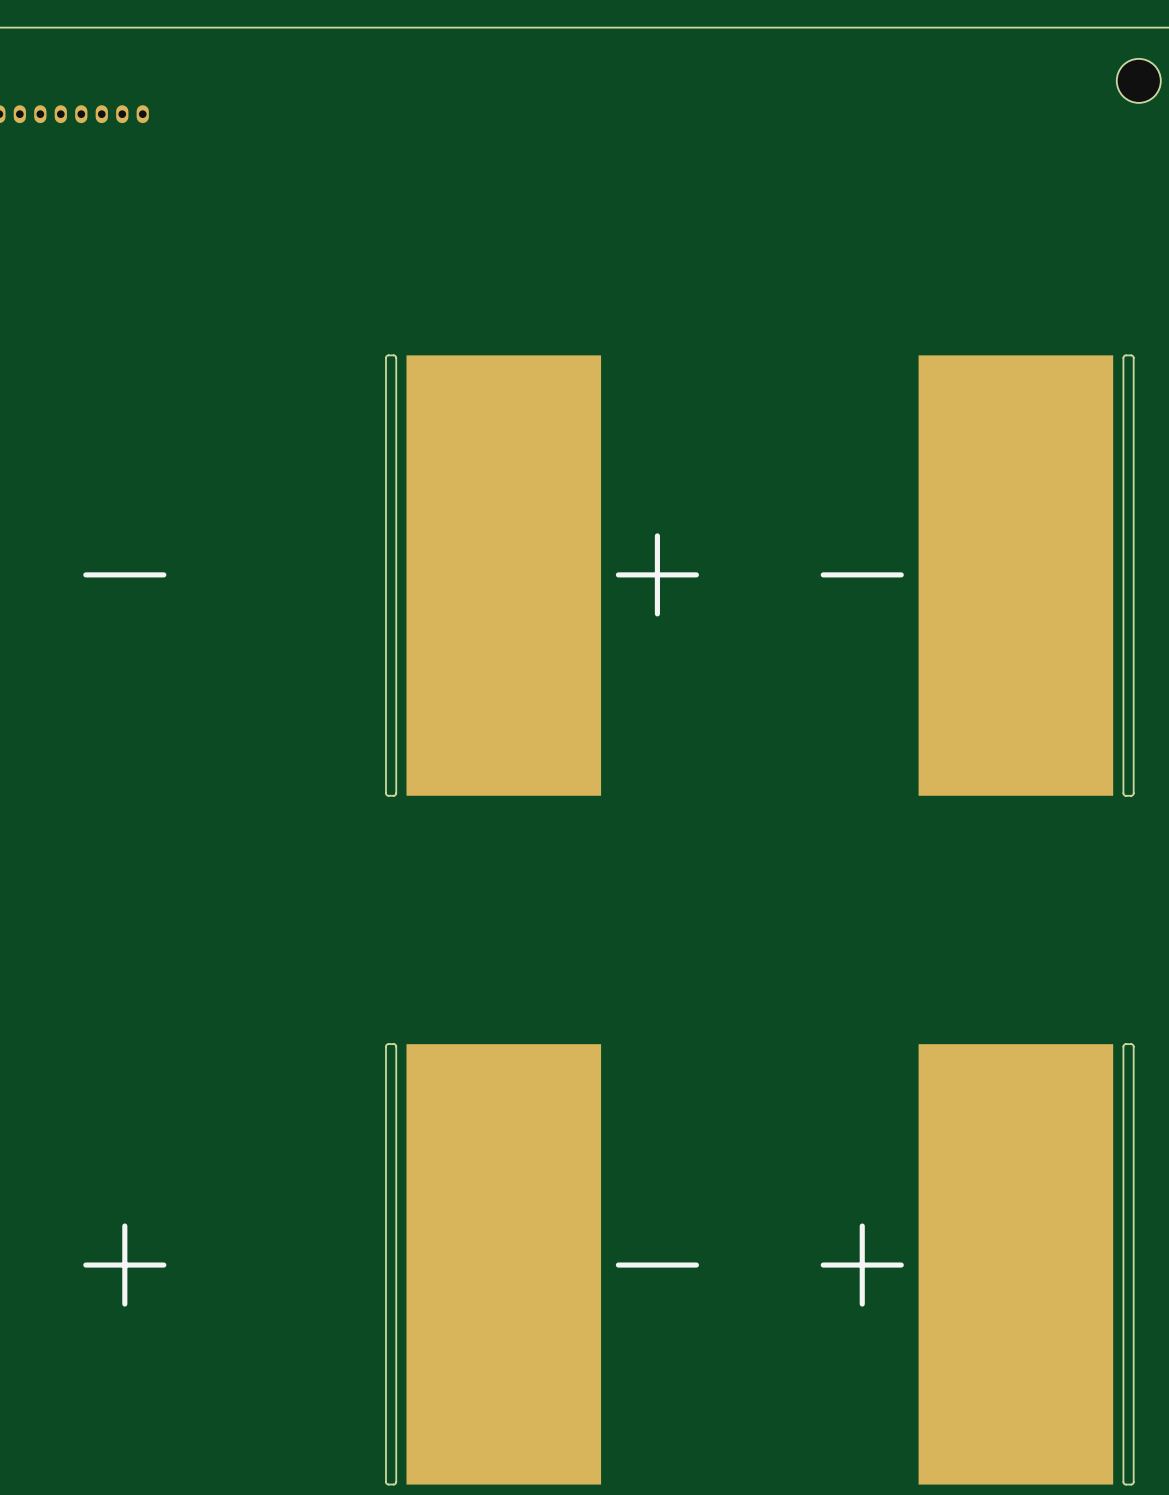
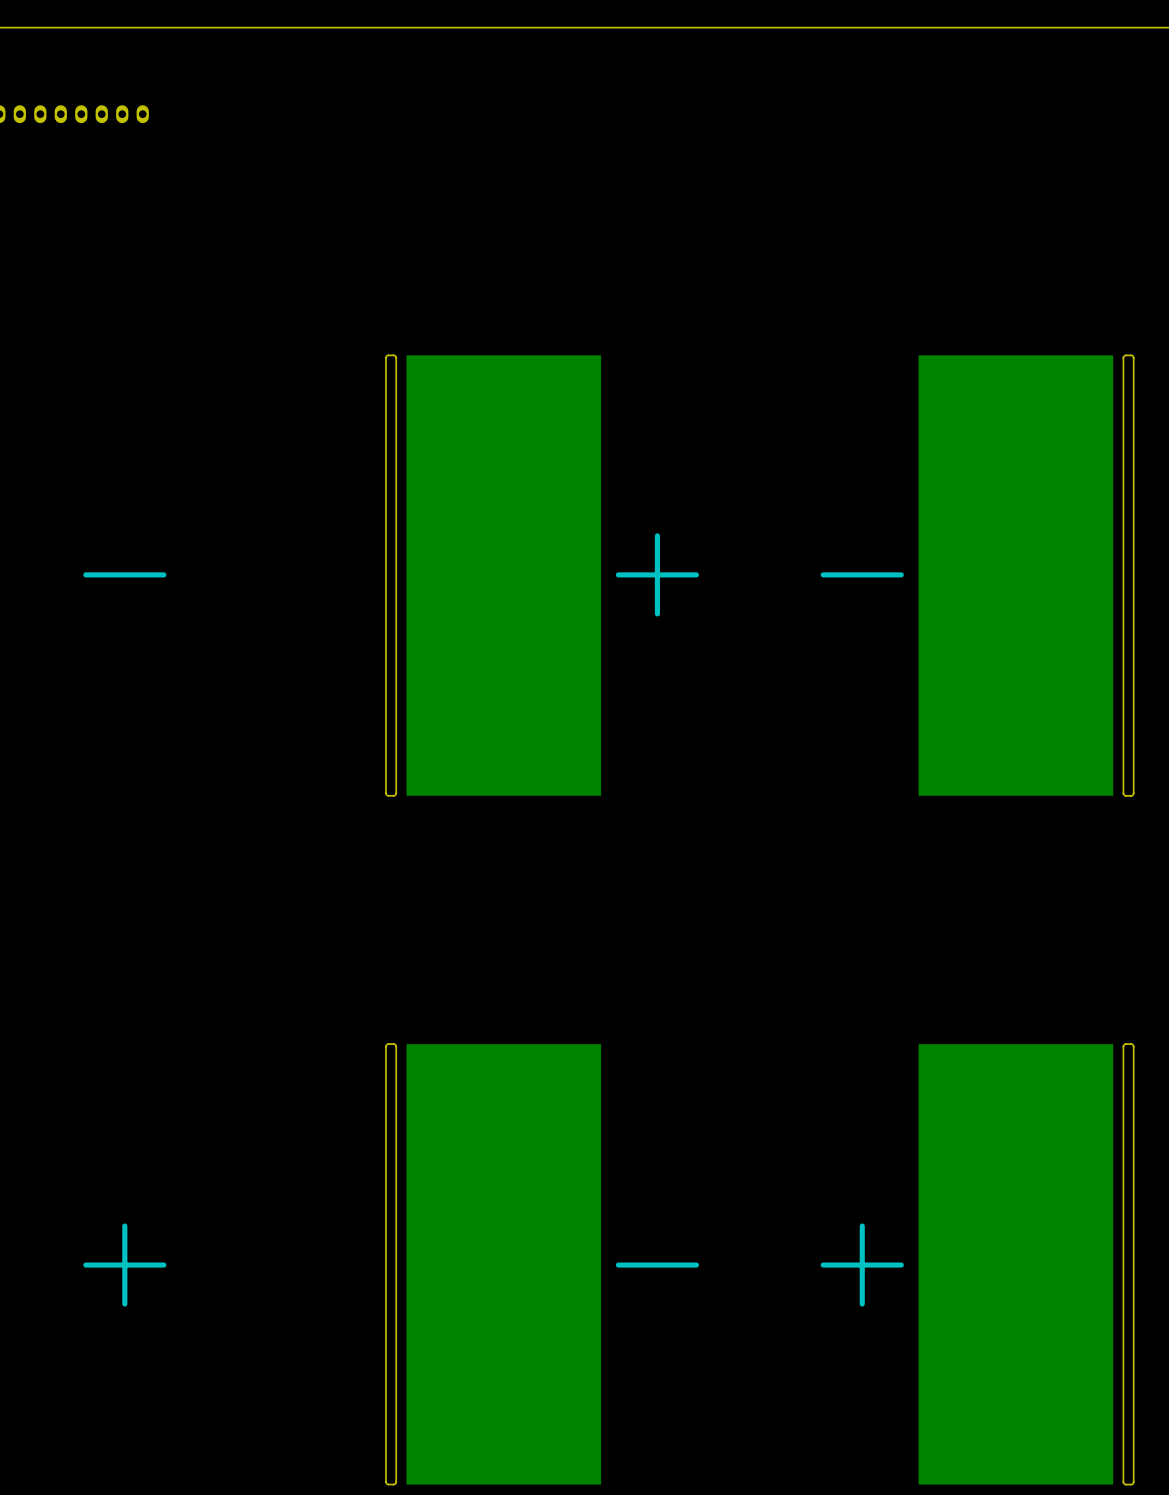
part: (1138, 80) -> none

